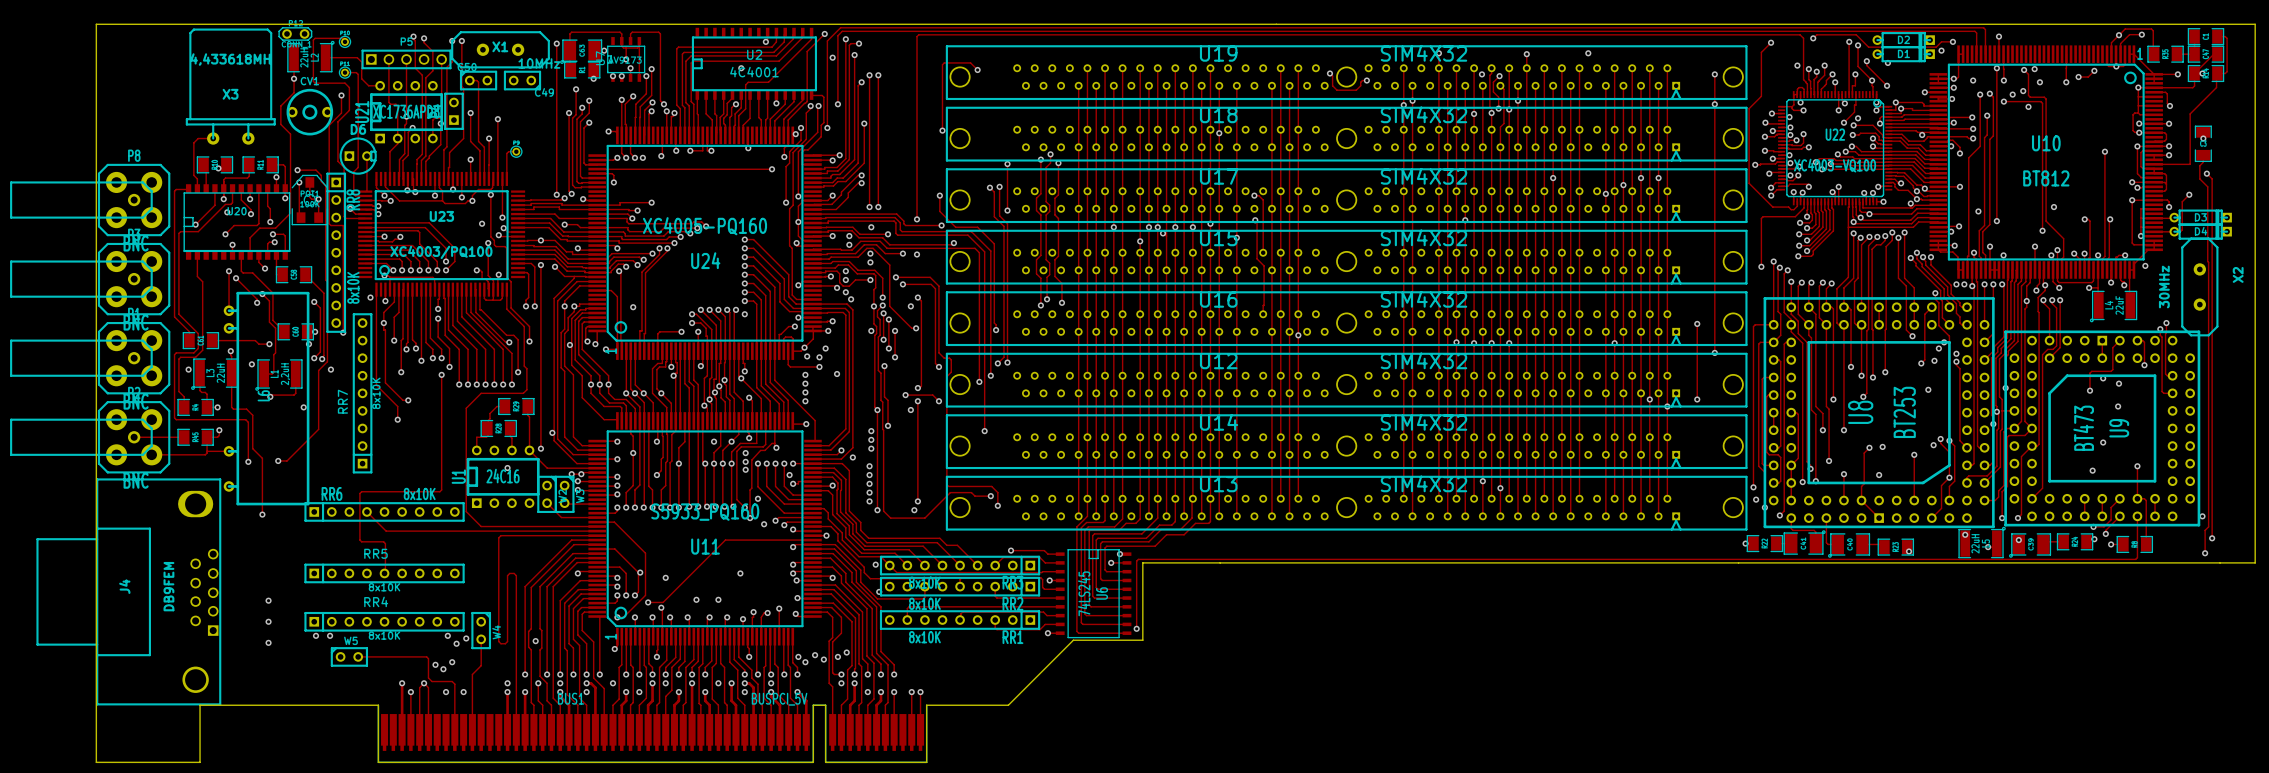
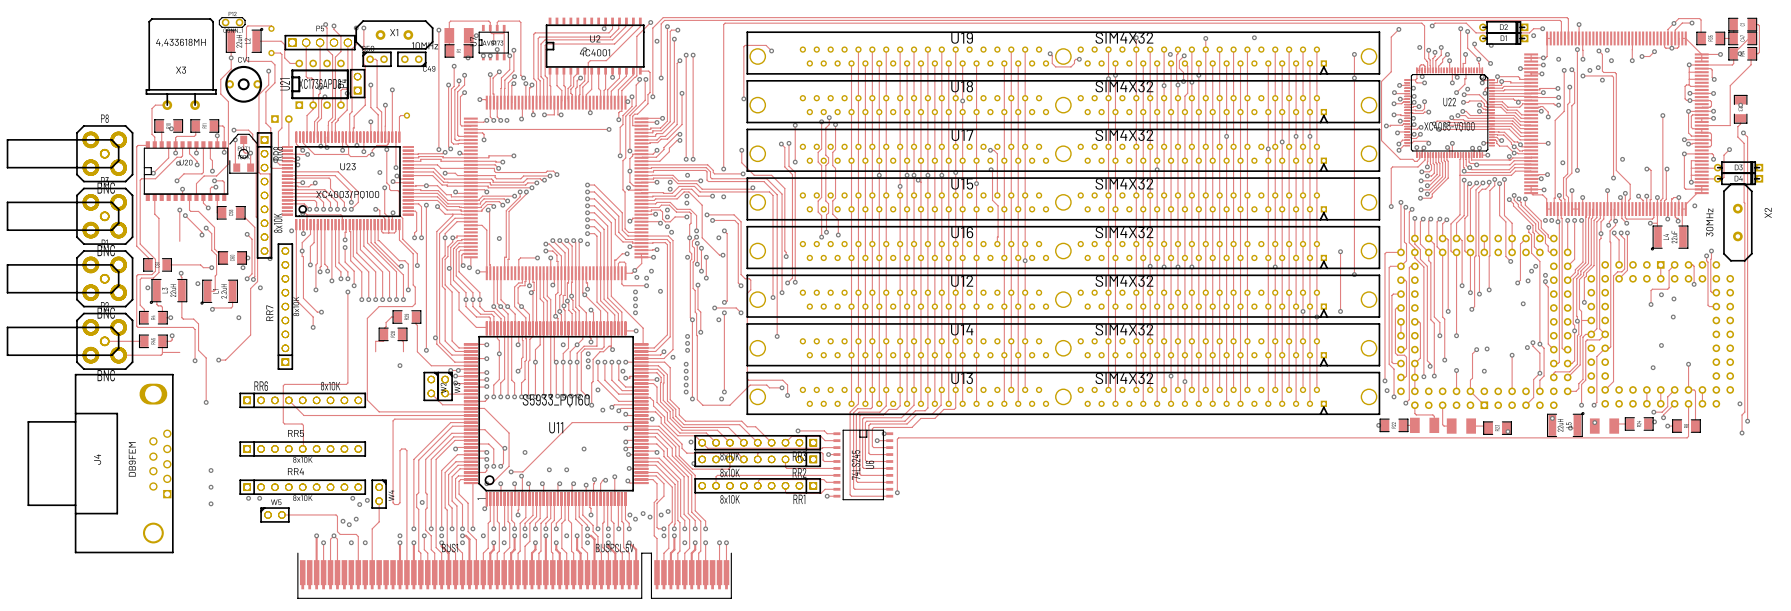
board edge: (96, 24) (2255, 24) (2255, 562) (1142, 562) (1142, 640) (1073, 640) (1008, 705) (926, 705) (926, 762) (825, 762) (825, 705) (813, 705) (813, 762) (378, 762) (378, 705) (200, 705) (200, 762) (96, 762) (96, 24) -> none
part: (345, 41) -> none
part: none -> (271, 28)
part: none -> (459, 35)
part: (581, 51) -> none
part: none -> (320, 42)
part: none -> (459, 50)
part: (345, 72) -> none
part: none -> (271, 53)
part: none -> (357, 83)
part: none -> (1449, 112)
part: (516, 151) -> none
part: none -> (406, 115)
D6: (358, 156) -> none
part: none -> (281, 119)
U10: BT812 (2046, 162) -> none
part: none -> (1616, 123)
part: none -> (104, 153)
part: none -> (347, 180)
U24: XC4005-PQ160 (705, 243) -> none
part: none -> (556, 187)
part: none -> (264, 195)
part: none -> (104, 216)
part: none -> (232, 257)
part: none -> (104, 278)
part: none -> (285, 306)
L6: (266, 398) -> none
U8: BT253 (1879, 412) -> none
part: none -> (1484, 321)
U9: BT473 (2102, 428) -> none
part: none -> (1660, 334)
part: none -> (104, 341)
U1: 24C16 (503, 476) -> none
part: none -> (431, 386)
part: none -> (445, 386)
part: none -> (302, 400)
part: none -> (556, 413)
part: (1804, 542) -> none
part: none -> (1394, 425)
part: none -> (1424, 425)
part: none -> (1461, 426)
part: none -> (1604, 426)
part: none -> (1686, 426)
part: (1849, 545) -> none
part: (2030, 545) -> none
part: none -> (1497, 428)
part: none -> (757, 442)
part: none -> (302, 448)
part: none -> (757, 459)
part: none -> (757, 485)
part: none -> (302, 487)
part: none -> (379, 494)
part: none -> (274, 514)

